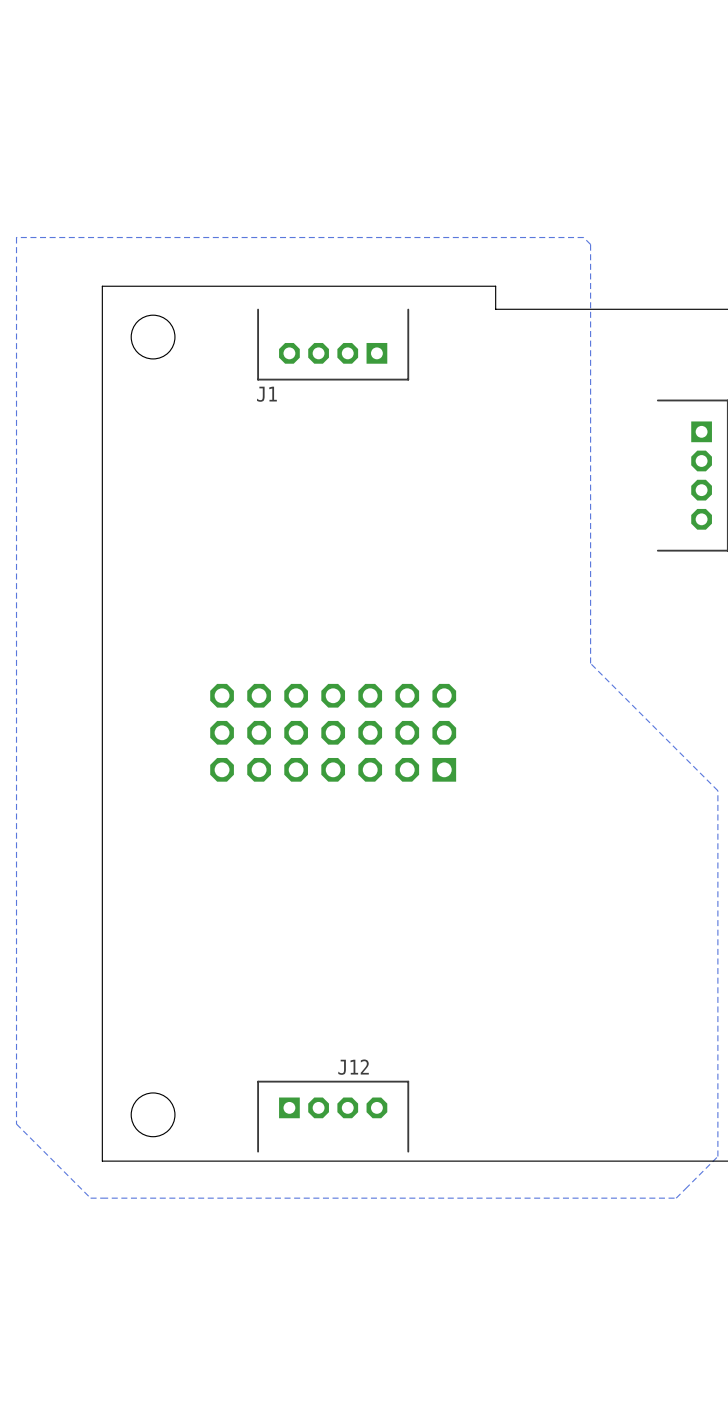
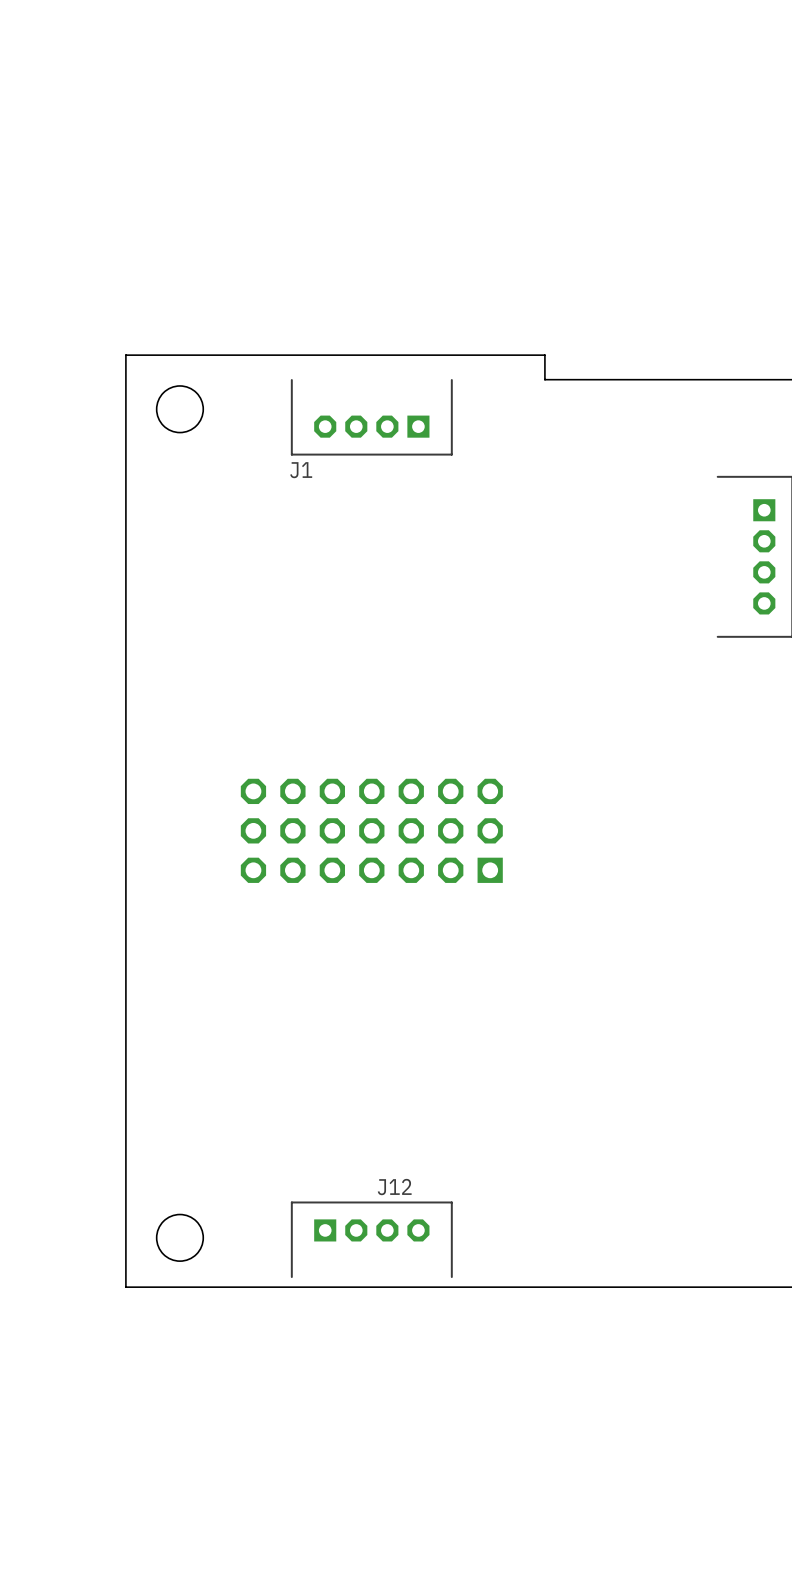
zone outline: (583, 237) (590, 244) (590, 663) (717, 790) (717, 1156) (676, 1198) (90, 1198) (16, 1124) (16, 237) (583, 237) -> none

